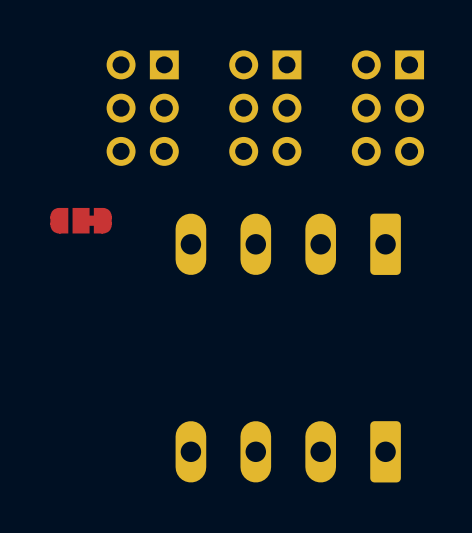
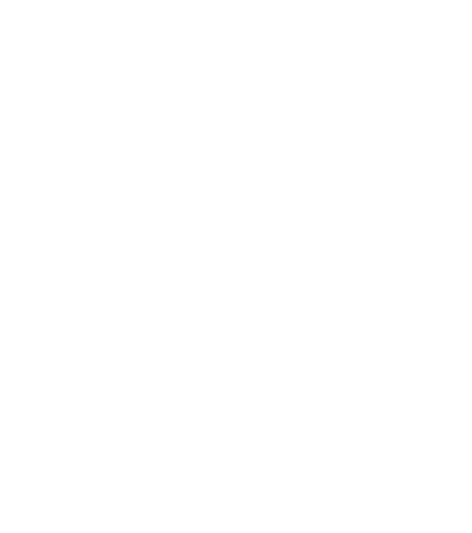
part: (142, 108) -> none
part: (265, 108) -> none
part: (387, 108) -> none
part: (81, 220) -> none
part: (288, 244) -> none
part: (288, 451) -> none

